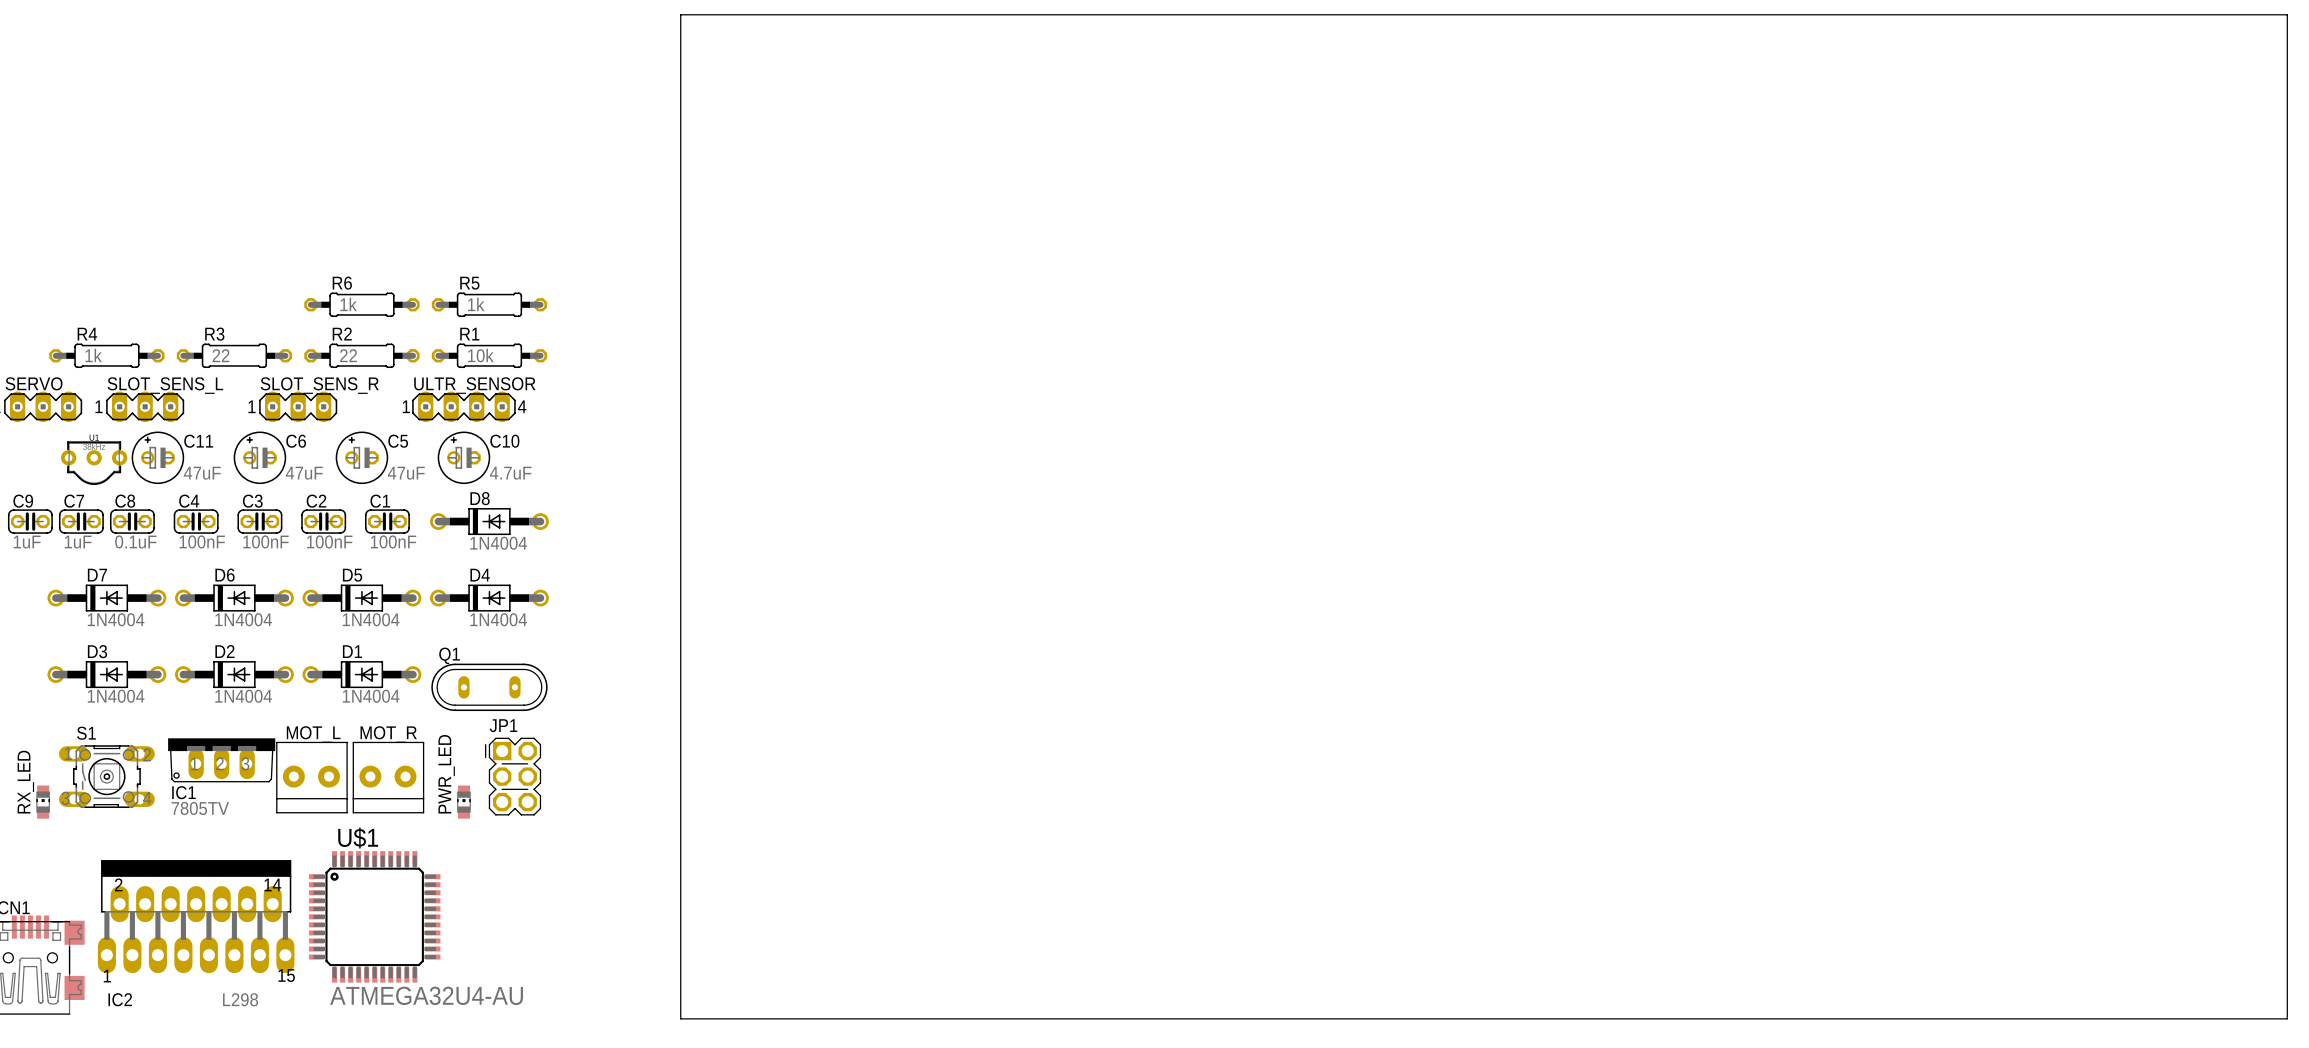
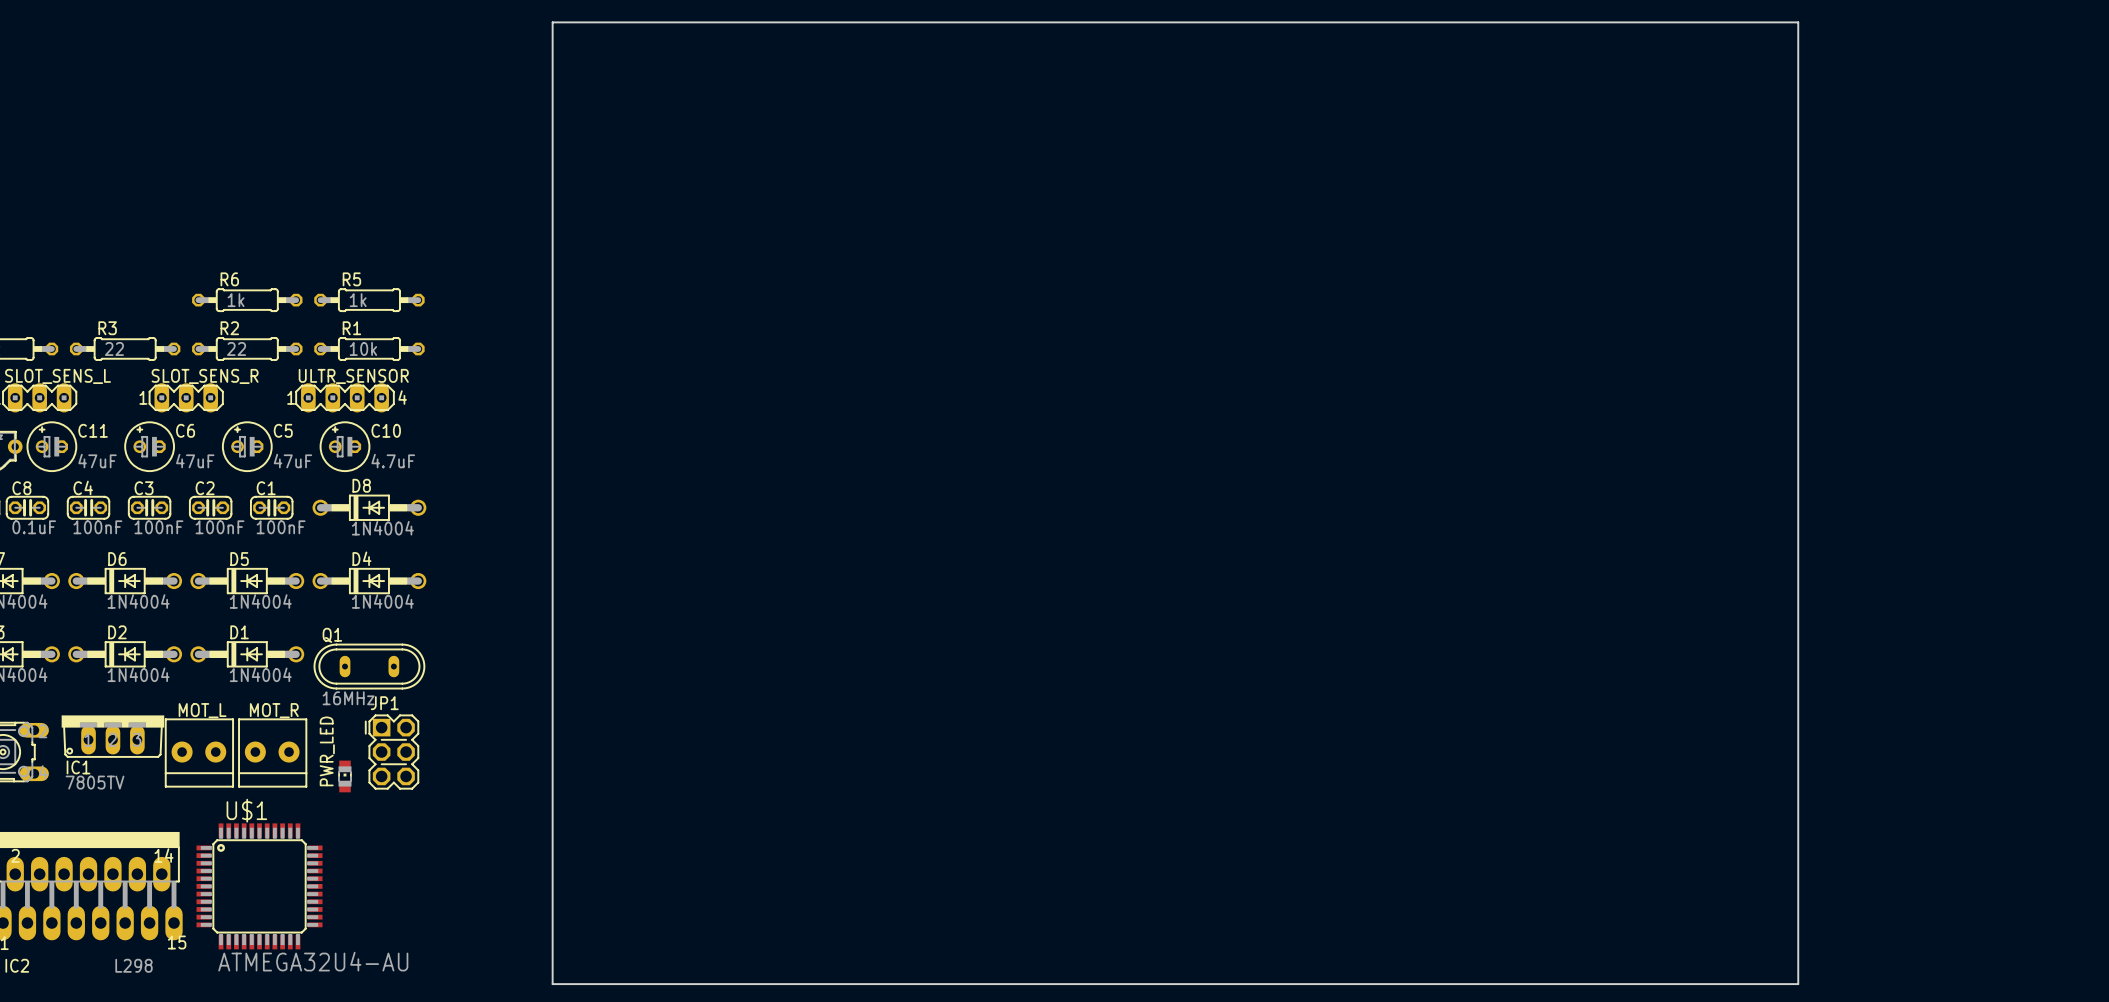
board edge: (1981, 14) (2287, 14) (2287, 1018) (1981, 1018) -> (1798, 22) (1798, 984)
Q1 value: none -> 16MHz (348, 698)

